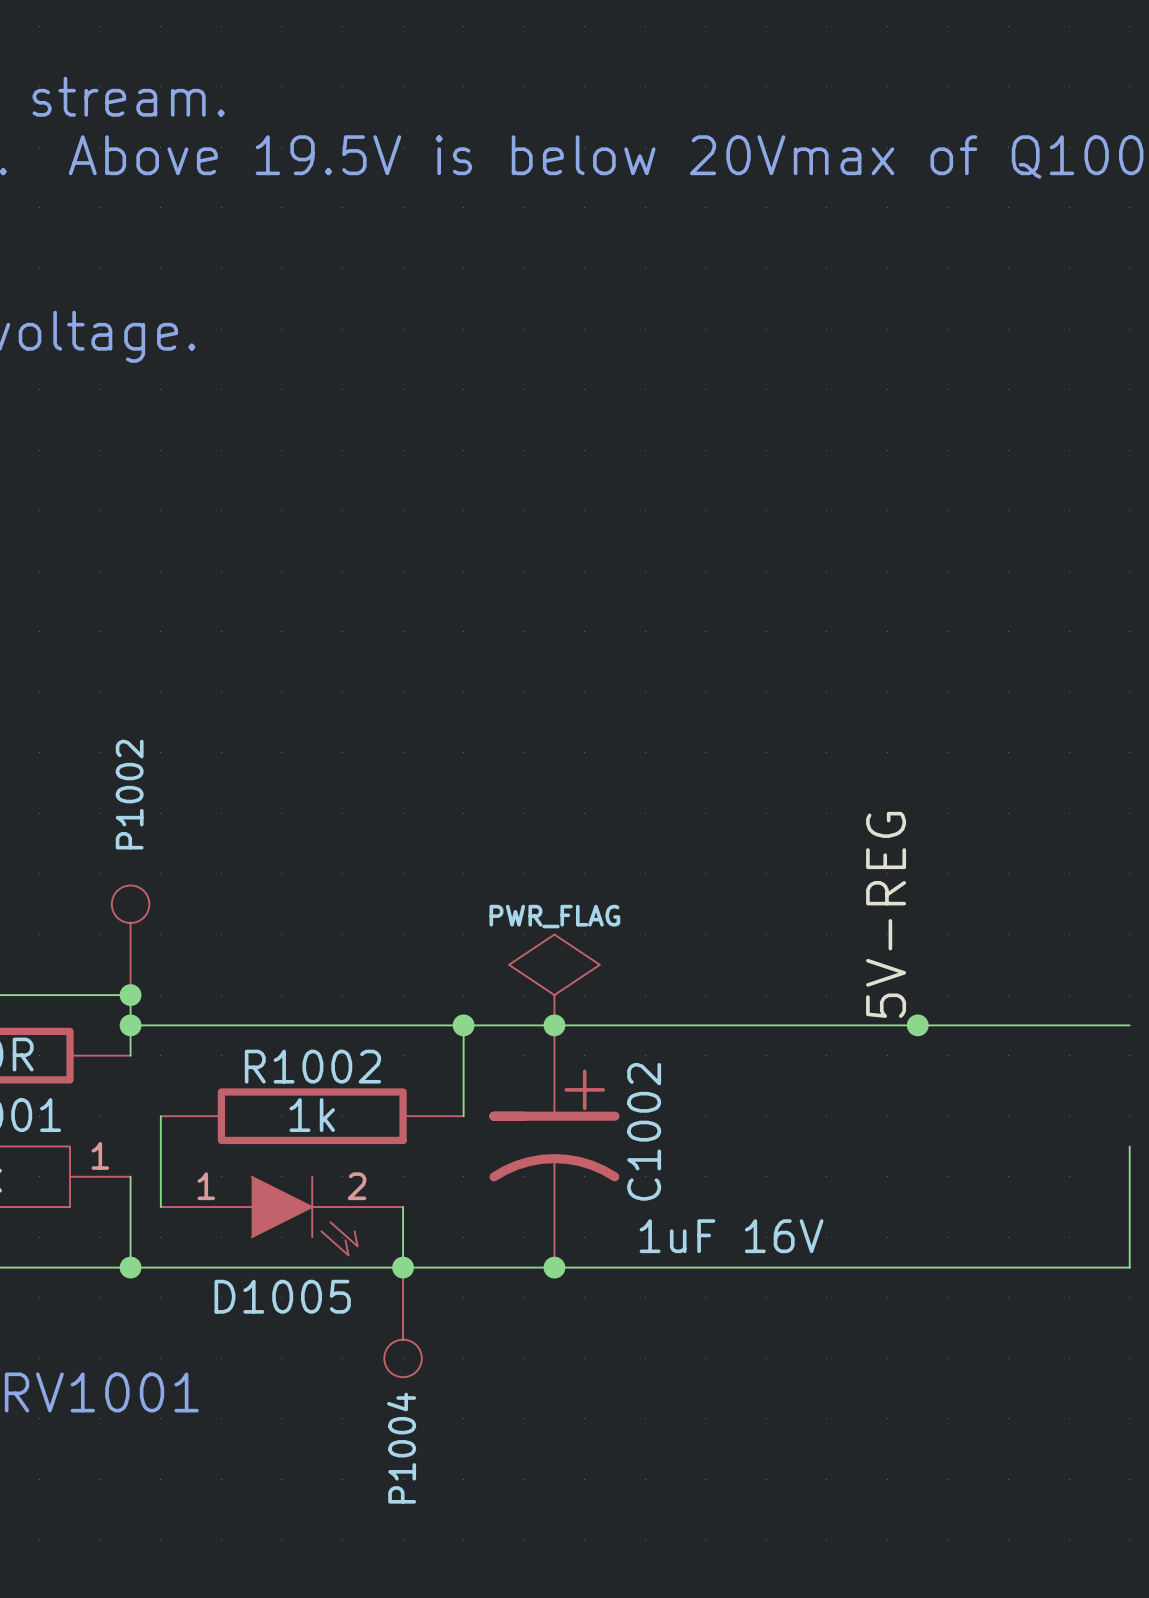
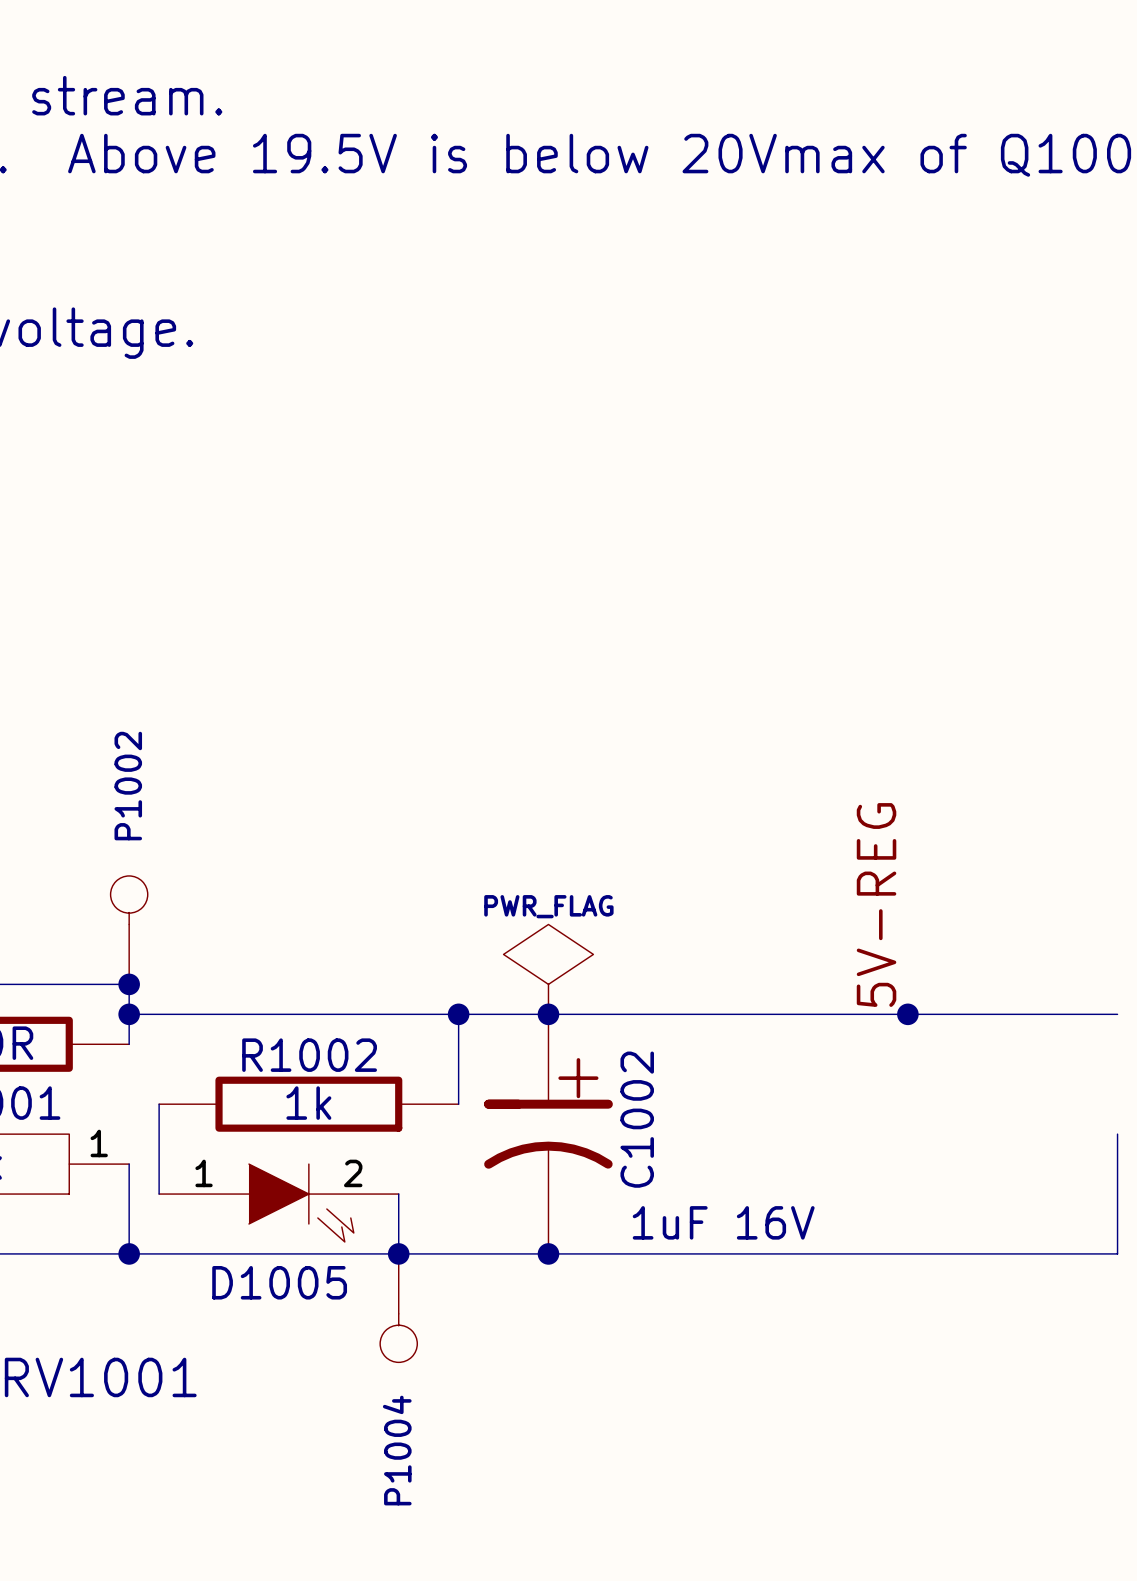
P1004 name position: P1004 (401, 1448) -> P1004 (397, 1450)

